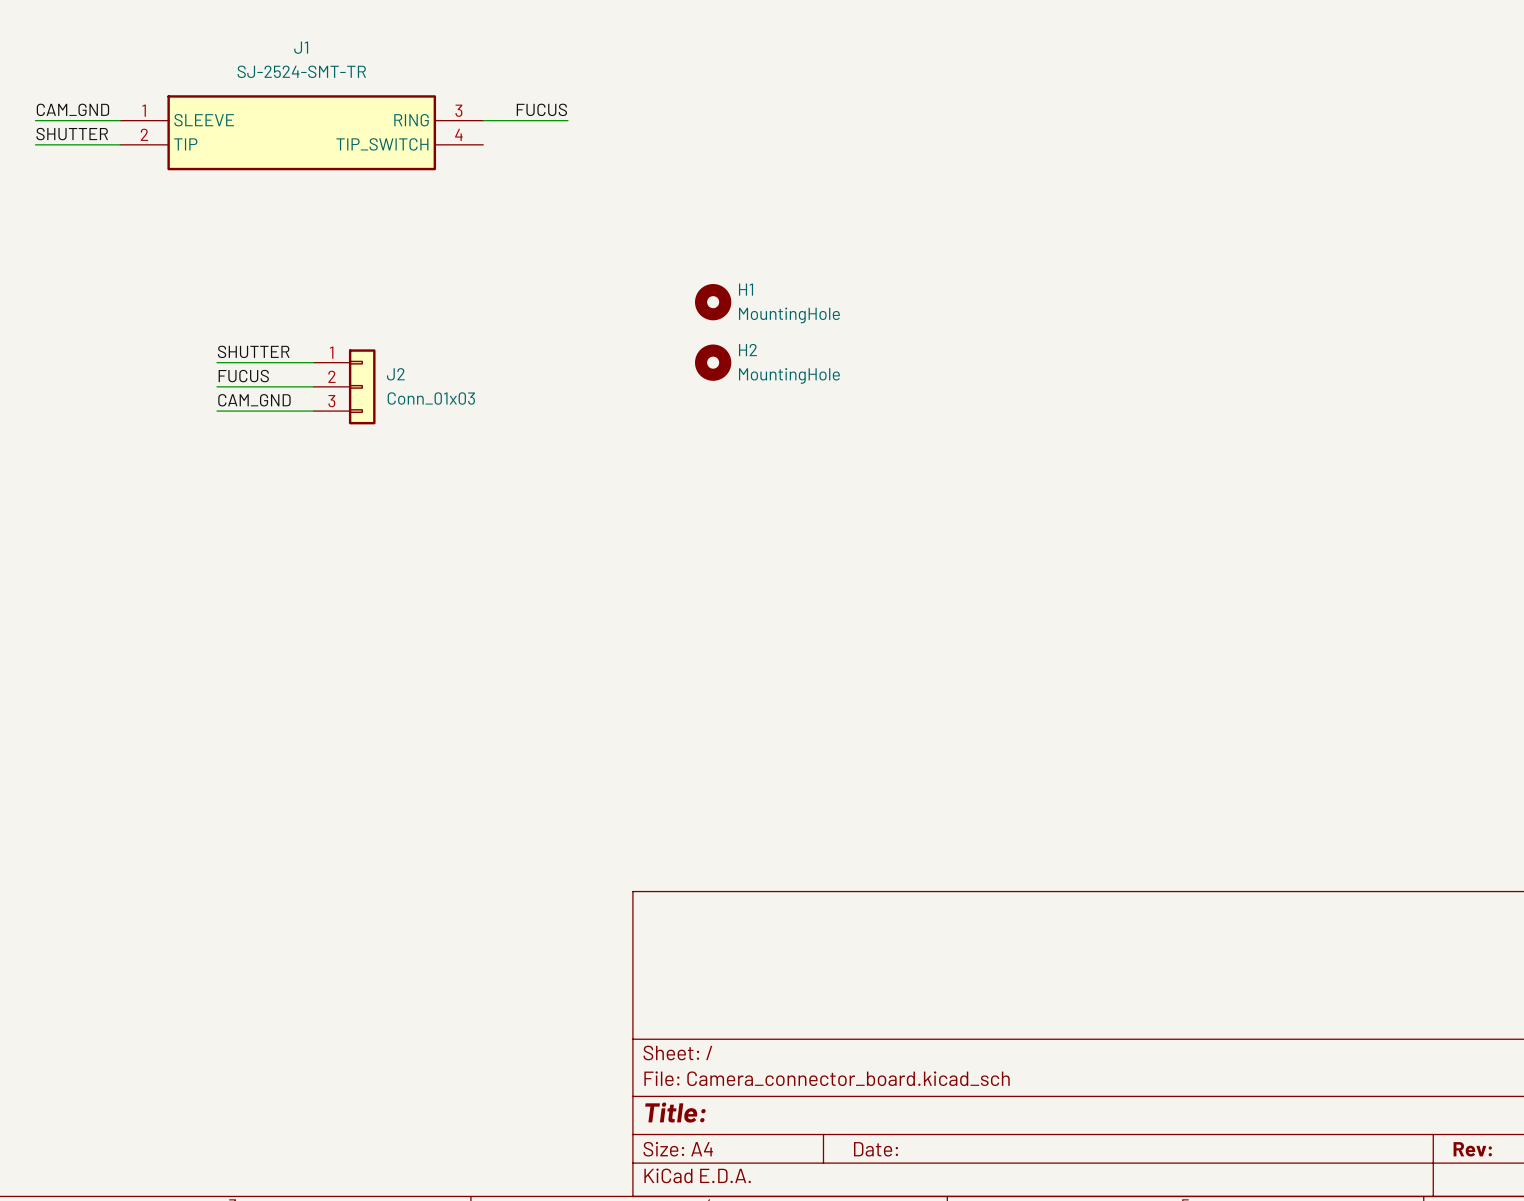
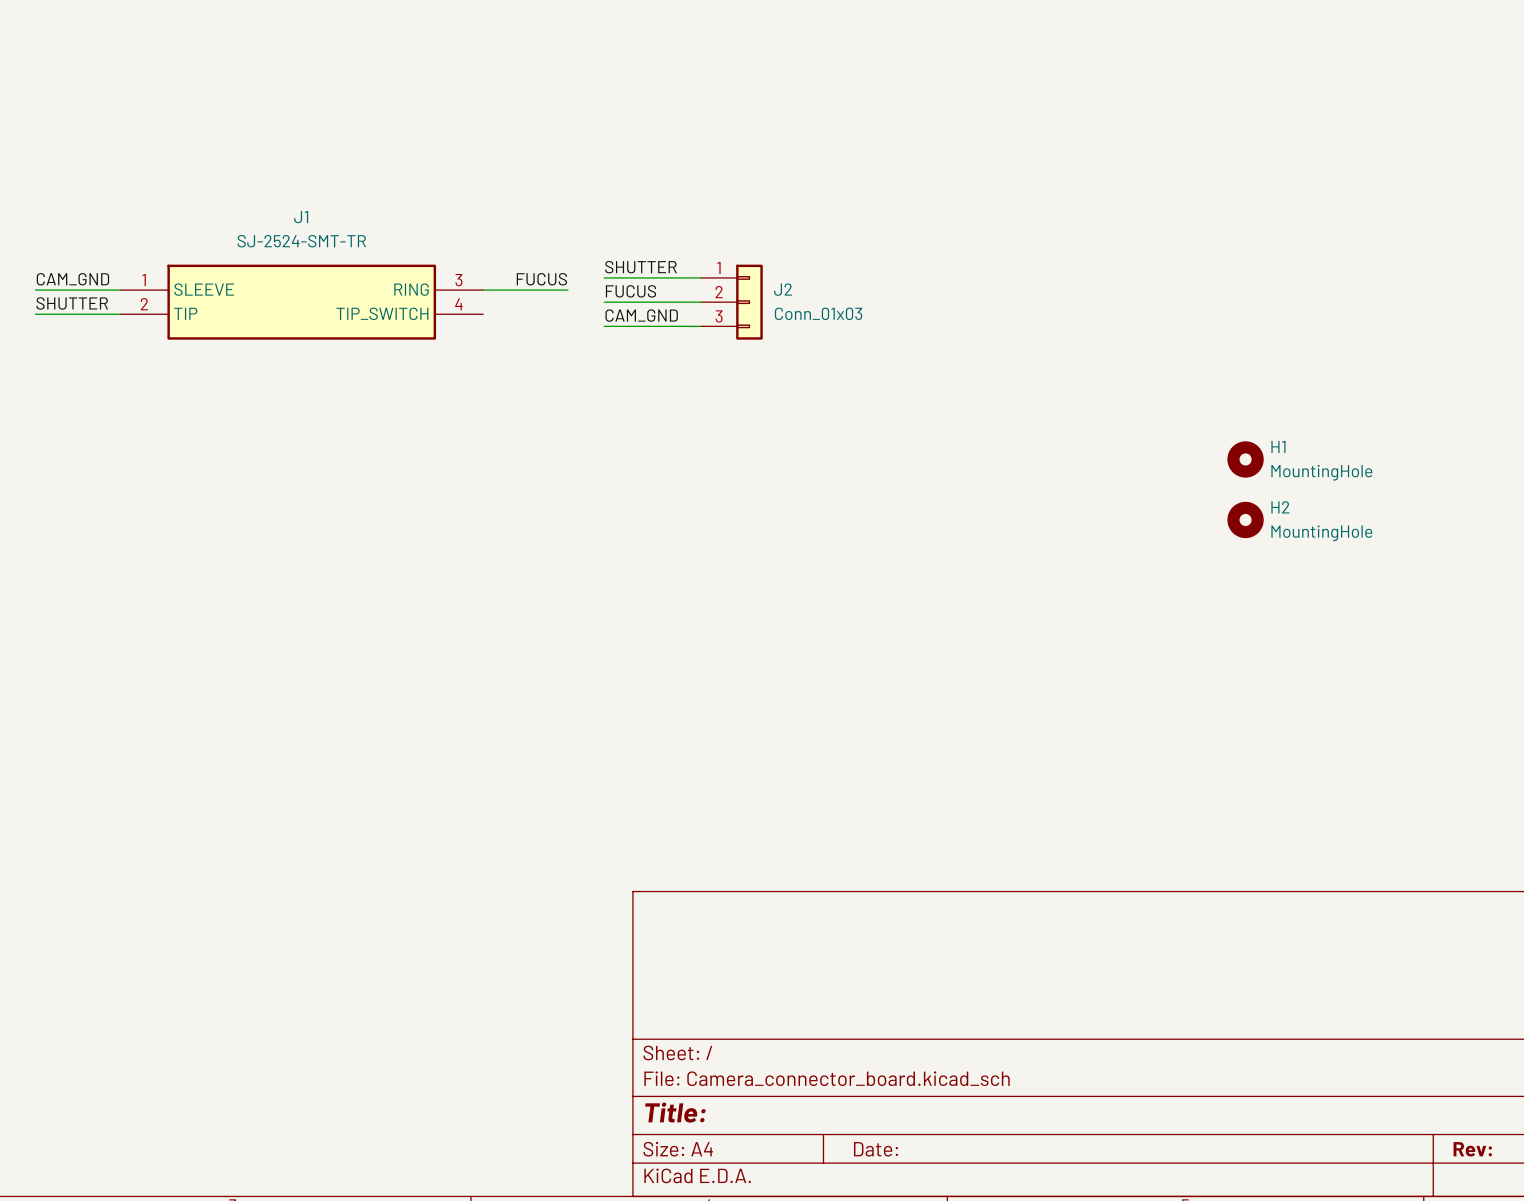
label: CAM_GND (72, 109) -> none
label: FUCUS (541, 109) -> none
wire: (35, 120) (120, 120) -> (35, 290) (120, 290)
wire: (483, 120) (567, 120) -> (483, 290) (567, 290)
J1 position: (301, 132) -> (301, 302)
label: SHUTTER (72, 134) -> none
wire: (35, 144) (120, 144) -> (35, 314) (120, 314)
label: none -> SHUTTER (640, 267)
wire: none -> (604, 277) (701, 277)
label: none -> CAM_GND (72, 279)
label: none -> FUCUS (541, 279)
label: none -> FUCUS (631, 291)
wire: none -> (604, 302) (701, 302)
H1 position: (713, 302) -> (1245, 459)
label: none -> SHUTTER (72, 303)
label: none -> CAM_GND (641, 315)
wire: none -> (604, 326) (701, 326)
label: SHUTTER (253, 351) -> none
wire: (217, 362) (313, 362) -> none
H2 position: (713, 362) -> (1245, 519)
label: FUCUS (243, 376) -> none
wire: (217, 386) (313, 386) -> none
J2 position: (344, 386) -> (731, 302)
label: CAM_GND (254, 400) -> none
wire: (217, 411) (313, 411) -> none

